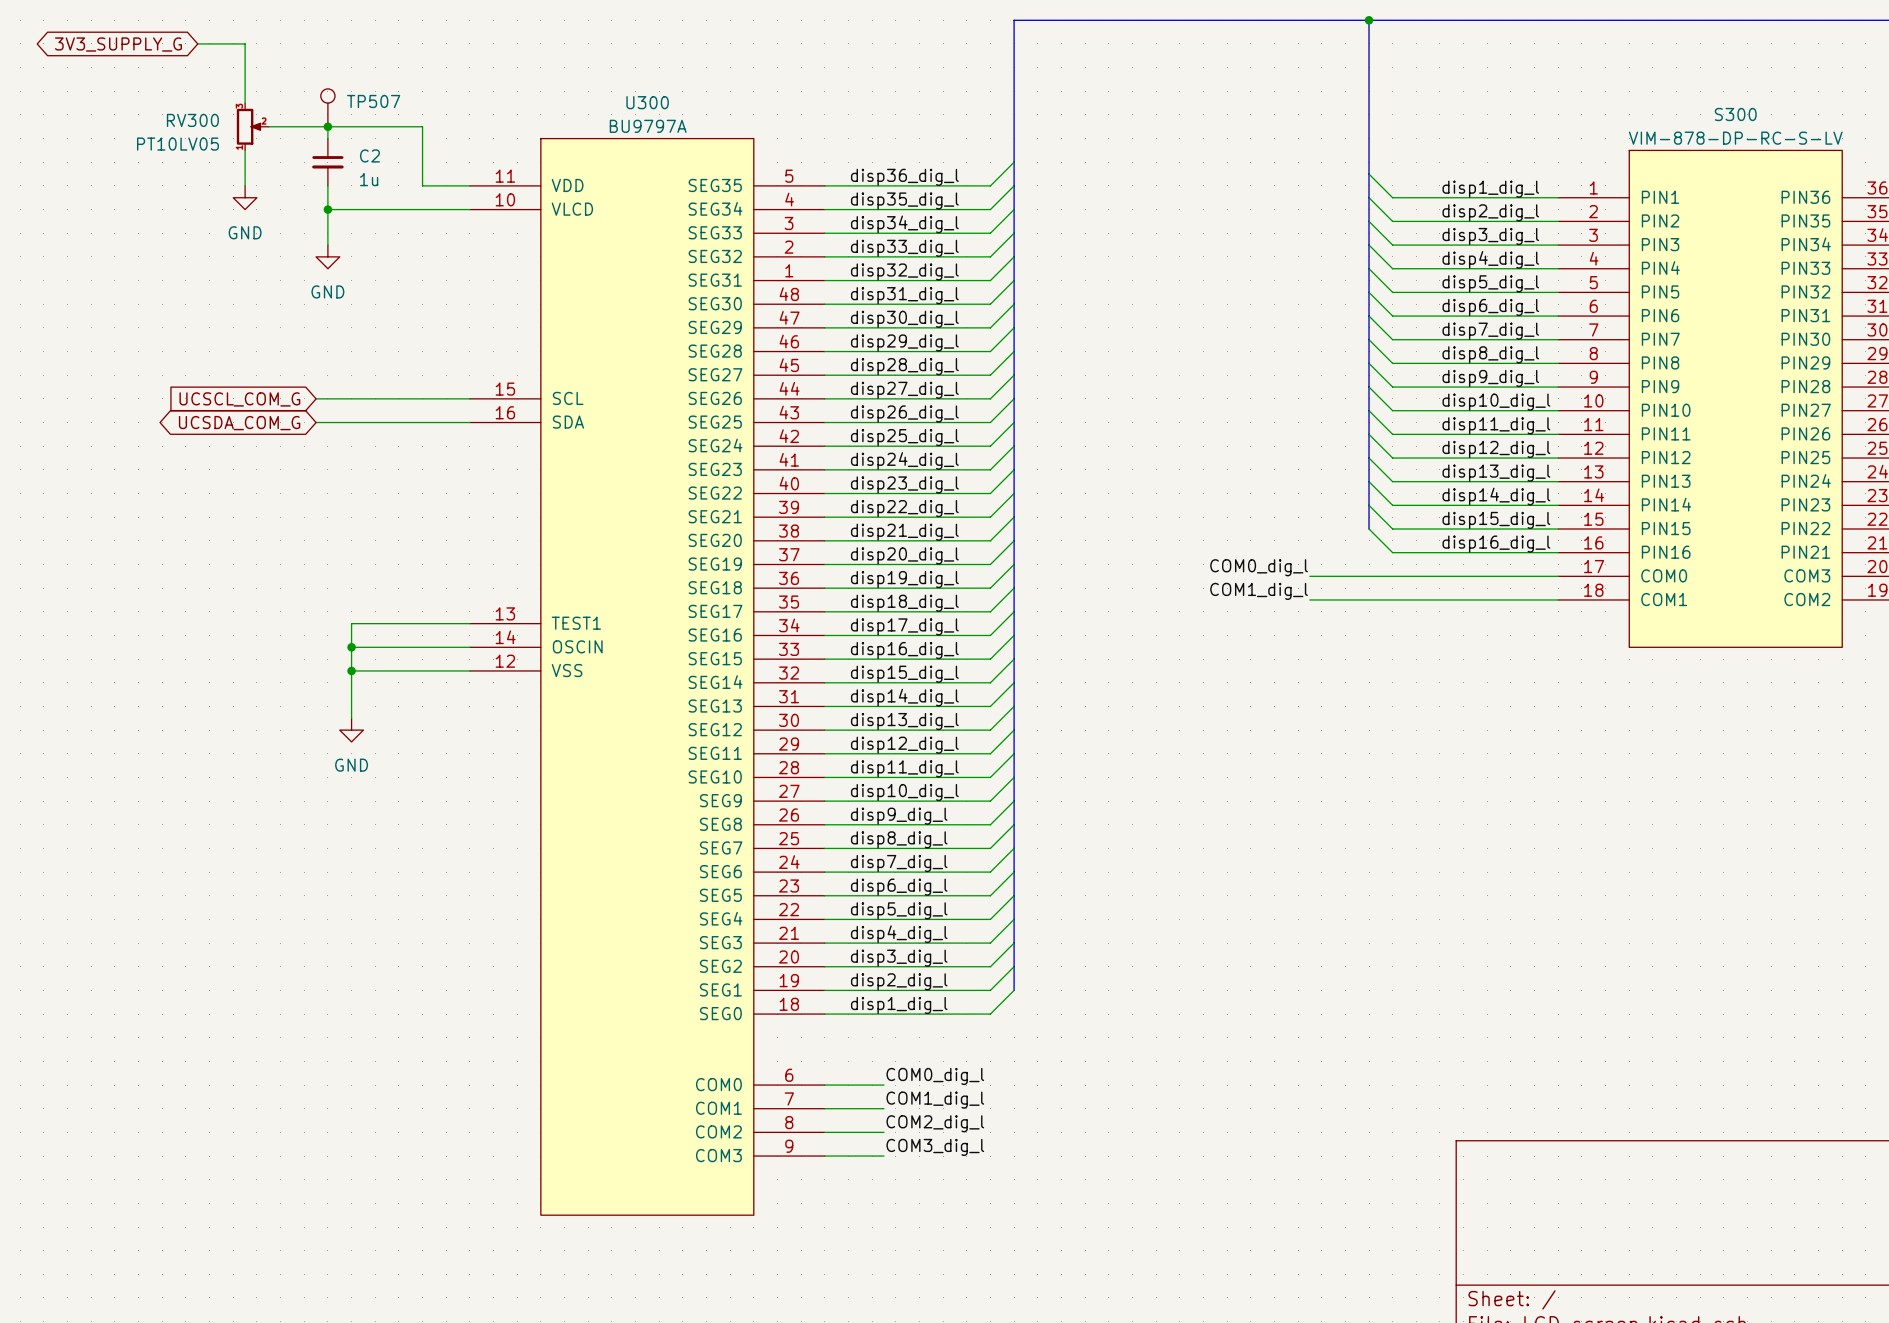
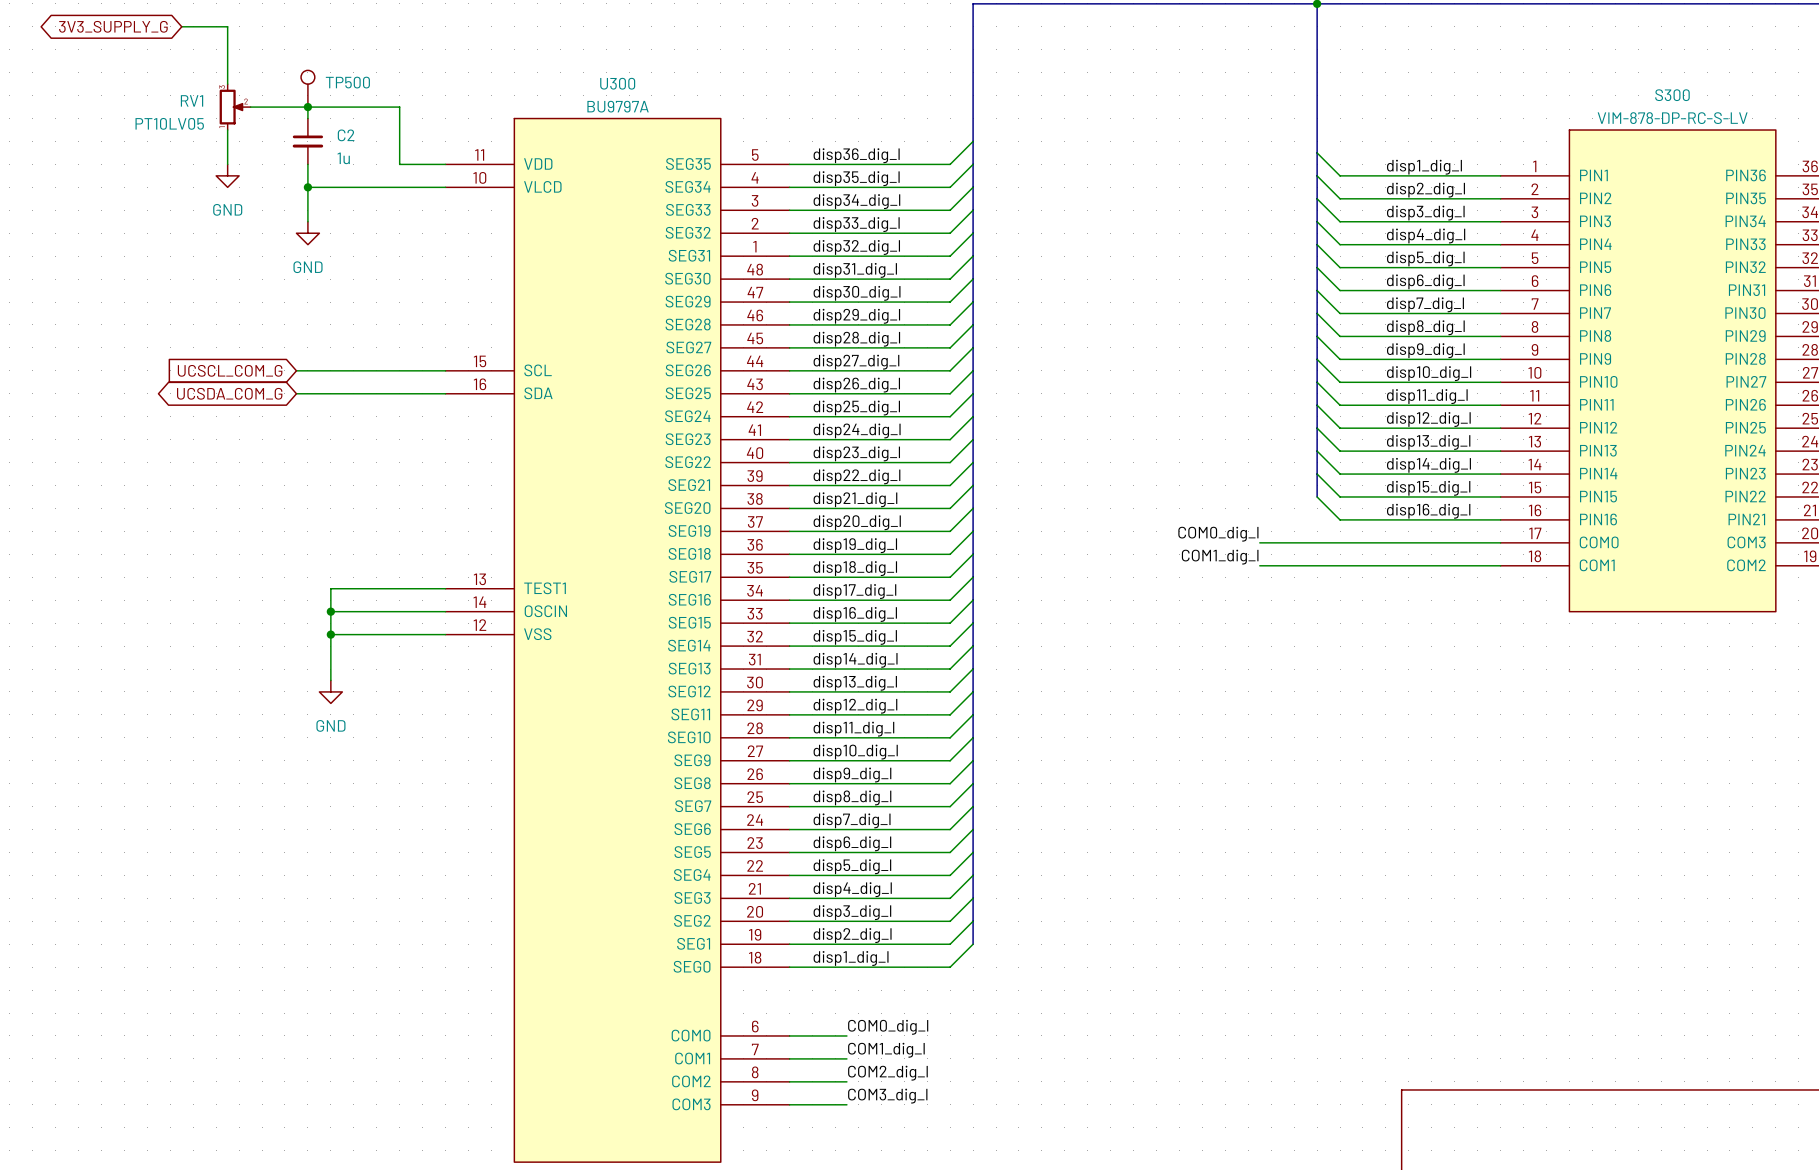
TP507 name: TP507 (373, 101) -> TP500 (347, 82)
RV300 name: RV300 (192, 120) -> RV1 (192, 100)

